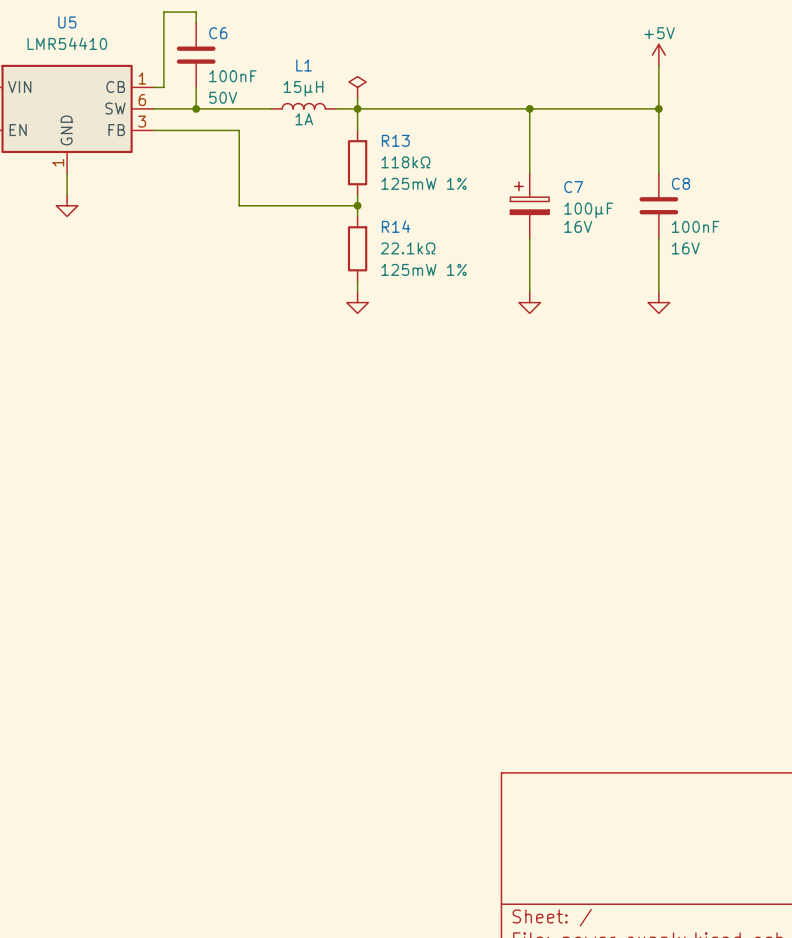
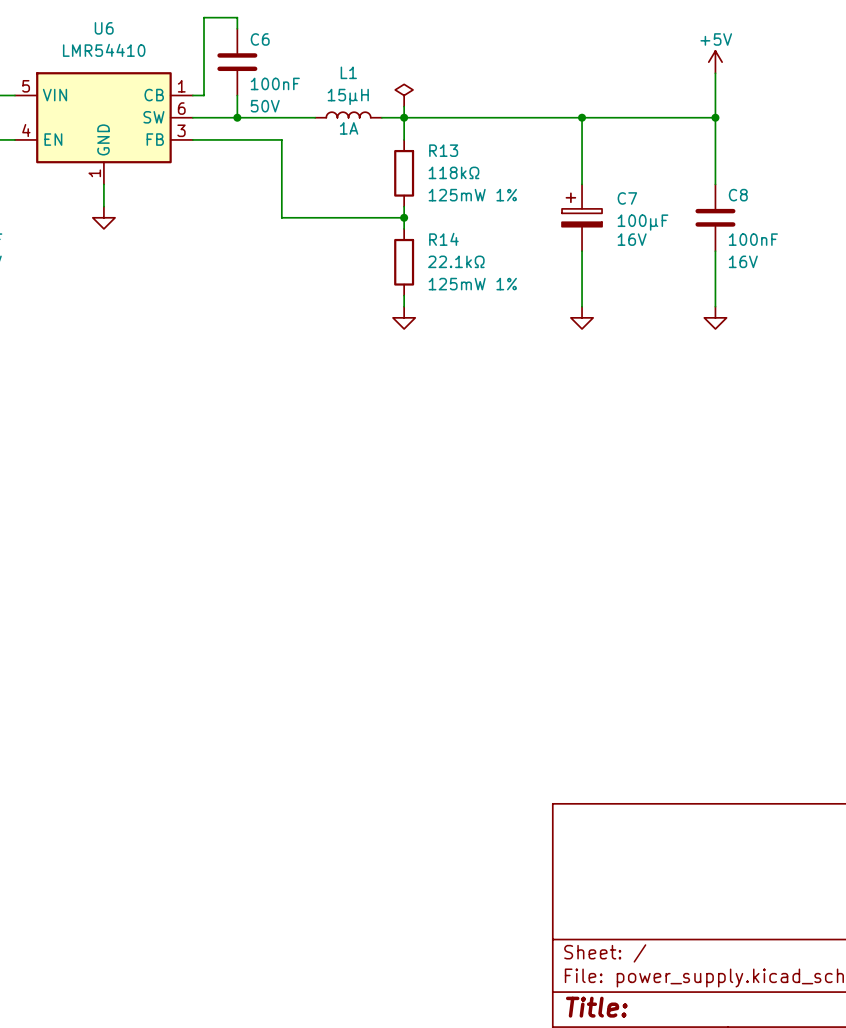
U5 name: U5 (67, 22) -> U6 (104, 28)

